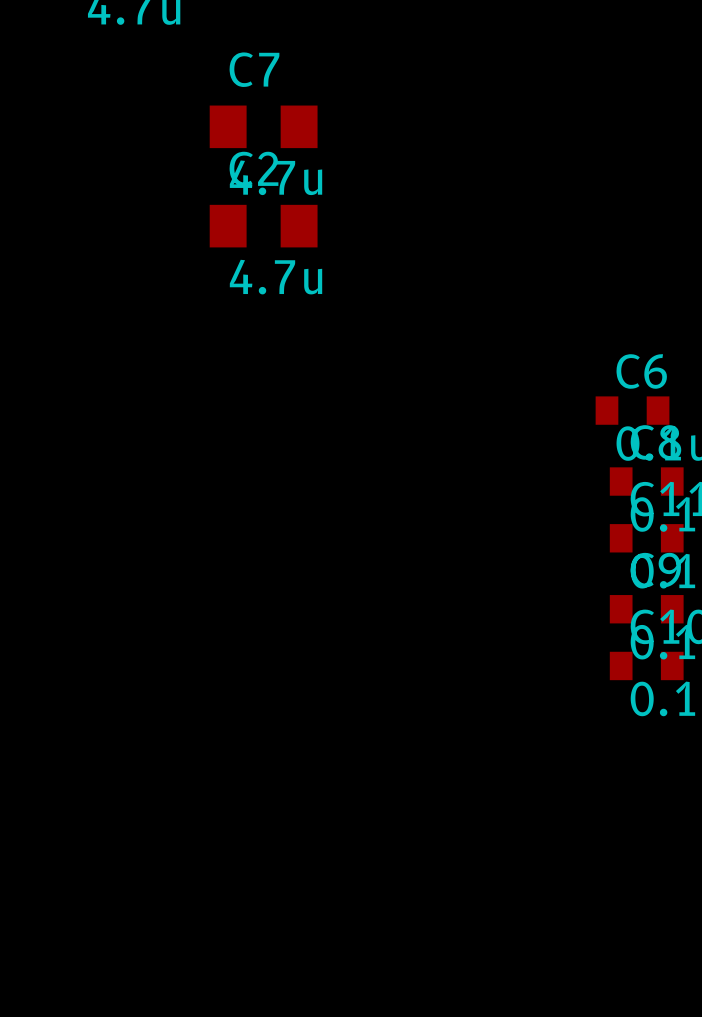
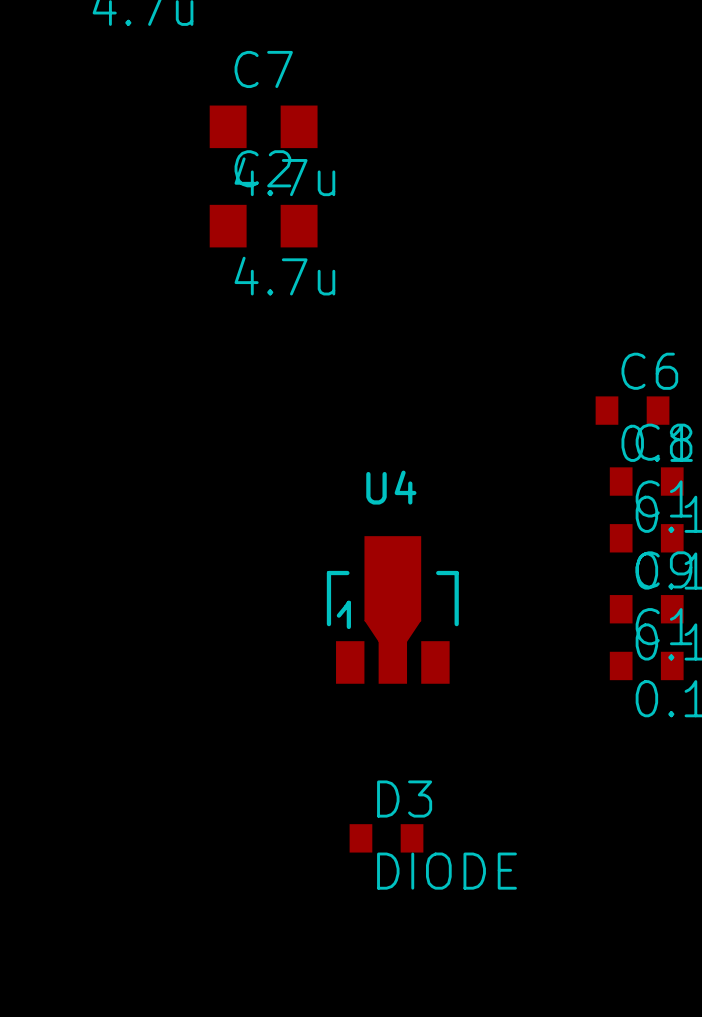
U4: none -> (392, 609)
D3: none -> DIODE (386, 838)

